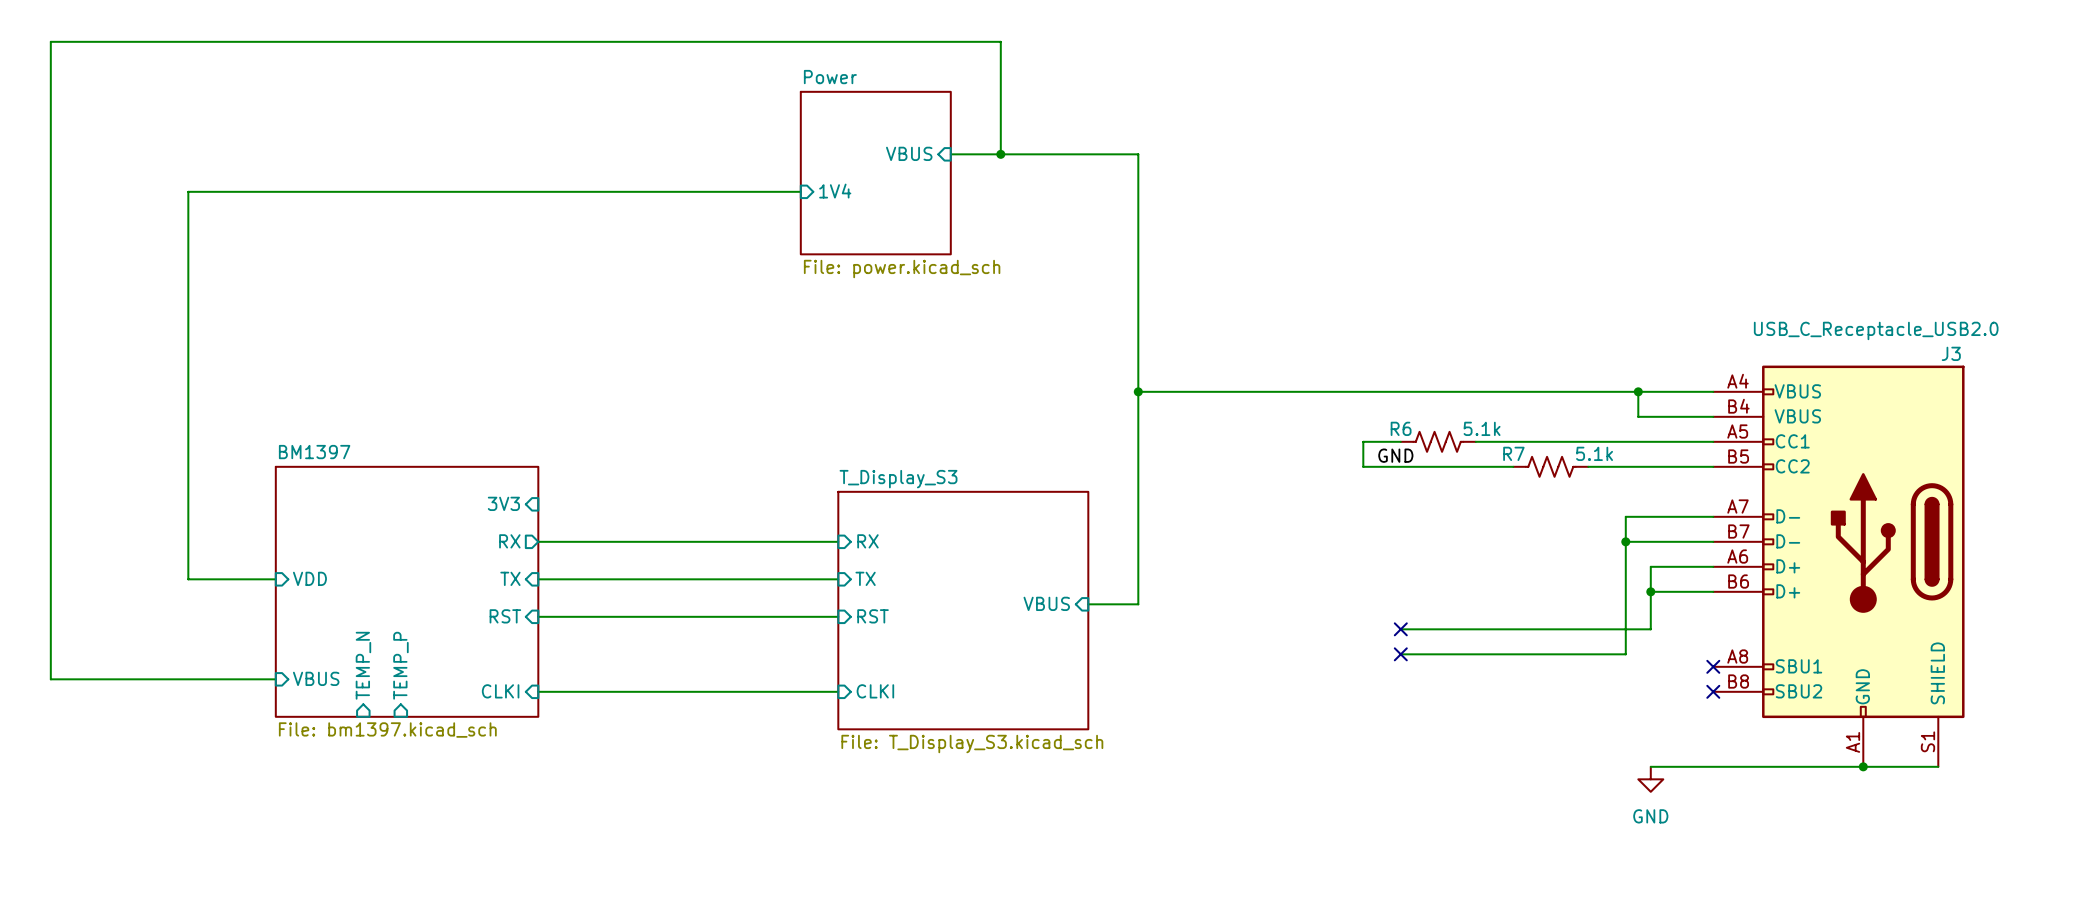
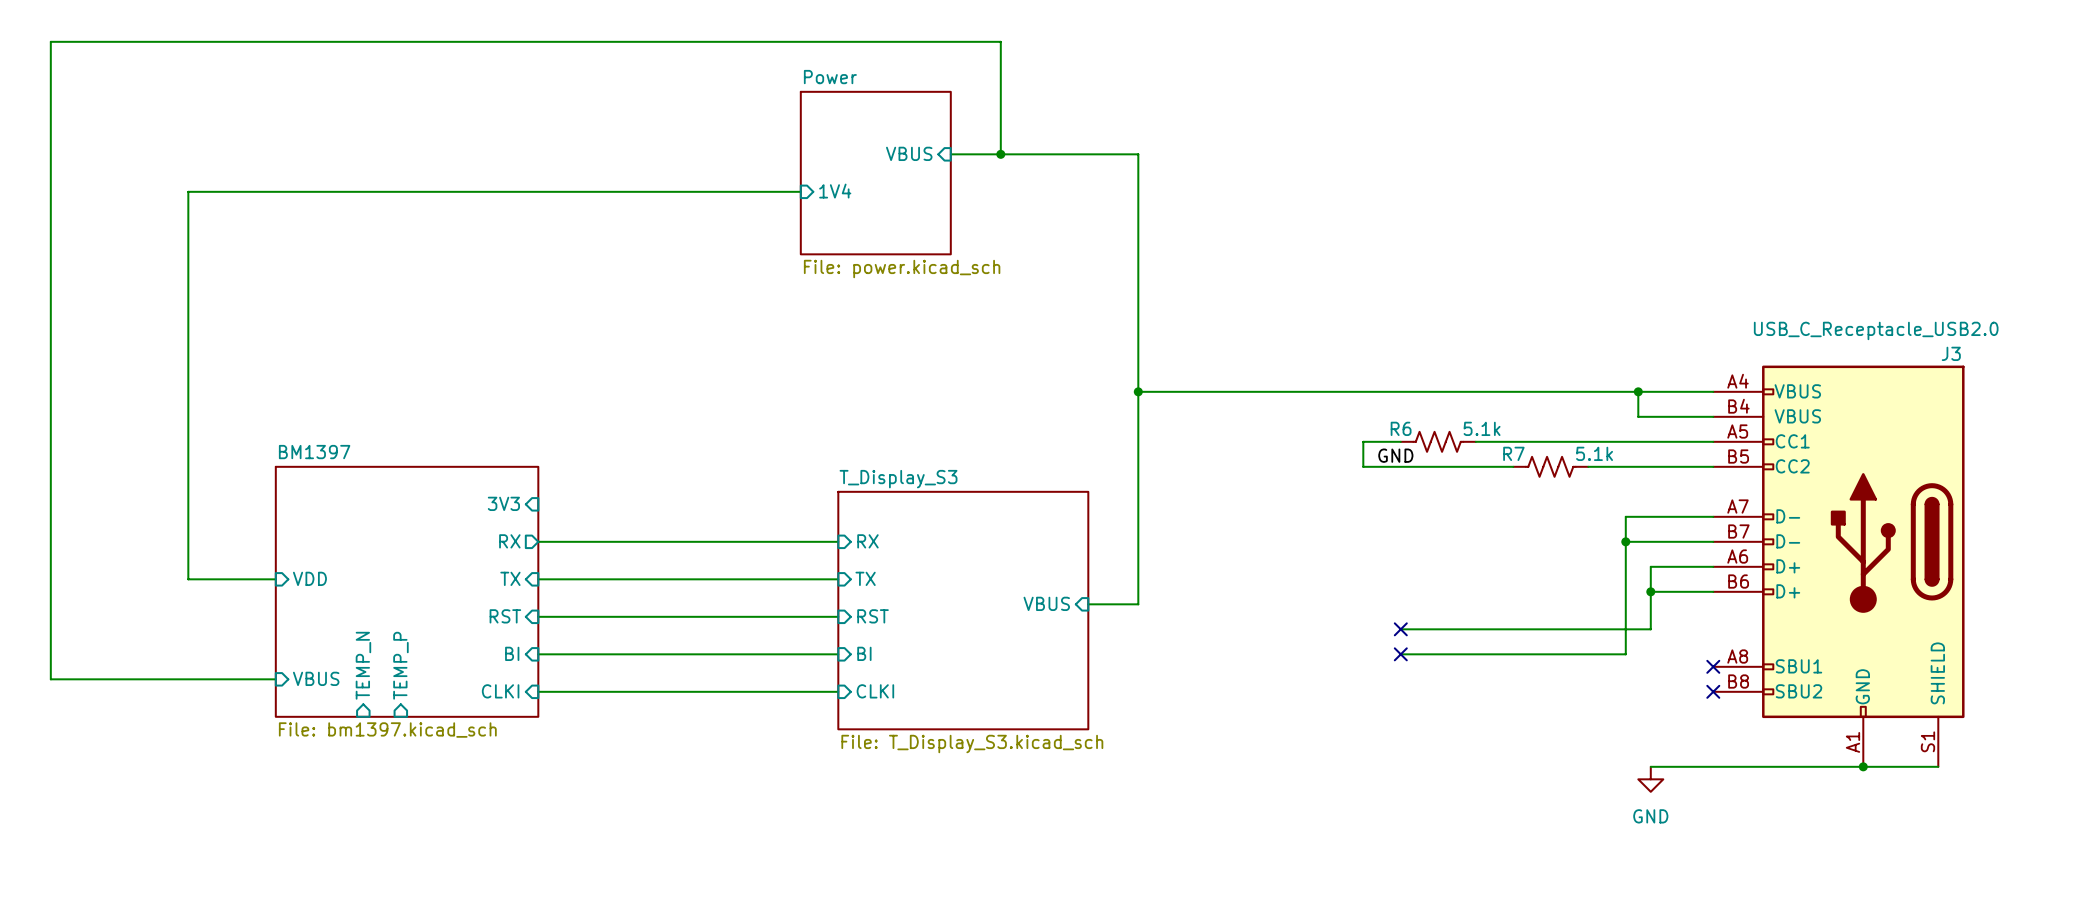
sheet pin: none -> BI (512, 653)
sheet pin: none -> BI (864, 653)
wire: none -> (538, 654) (838, 654)

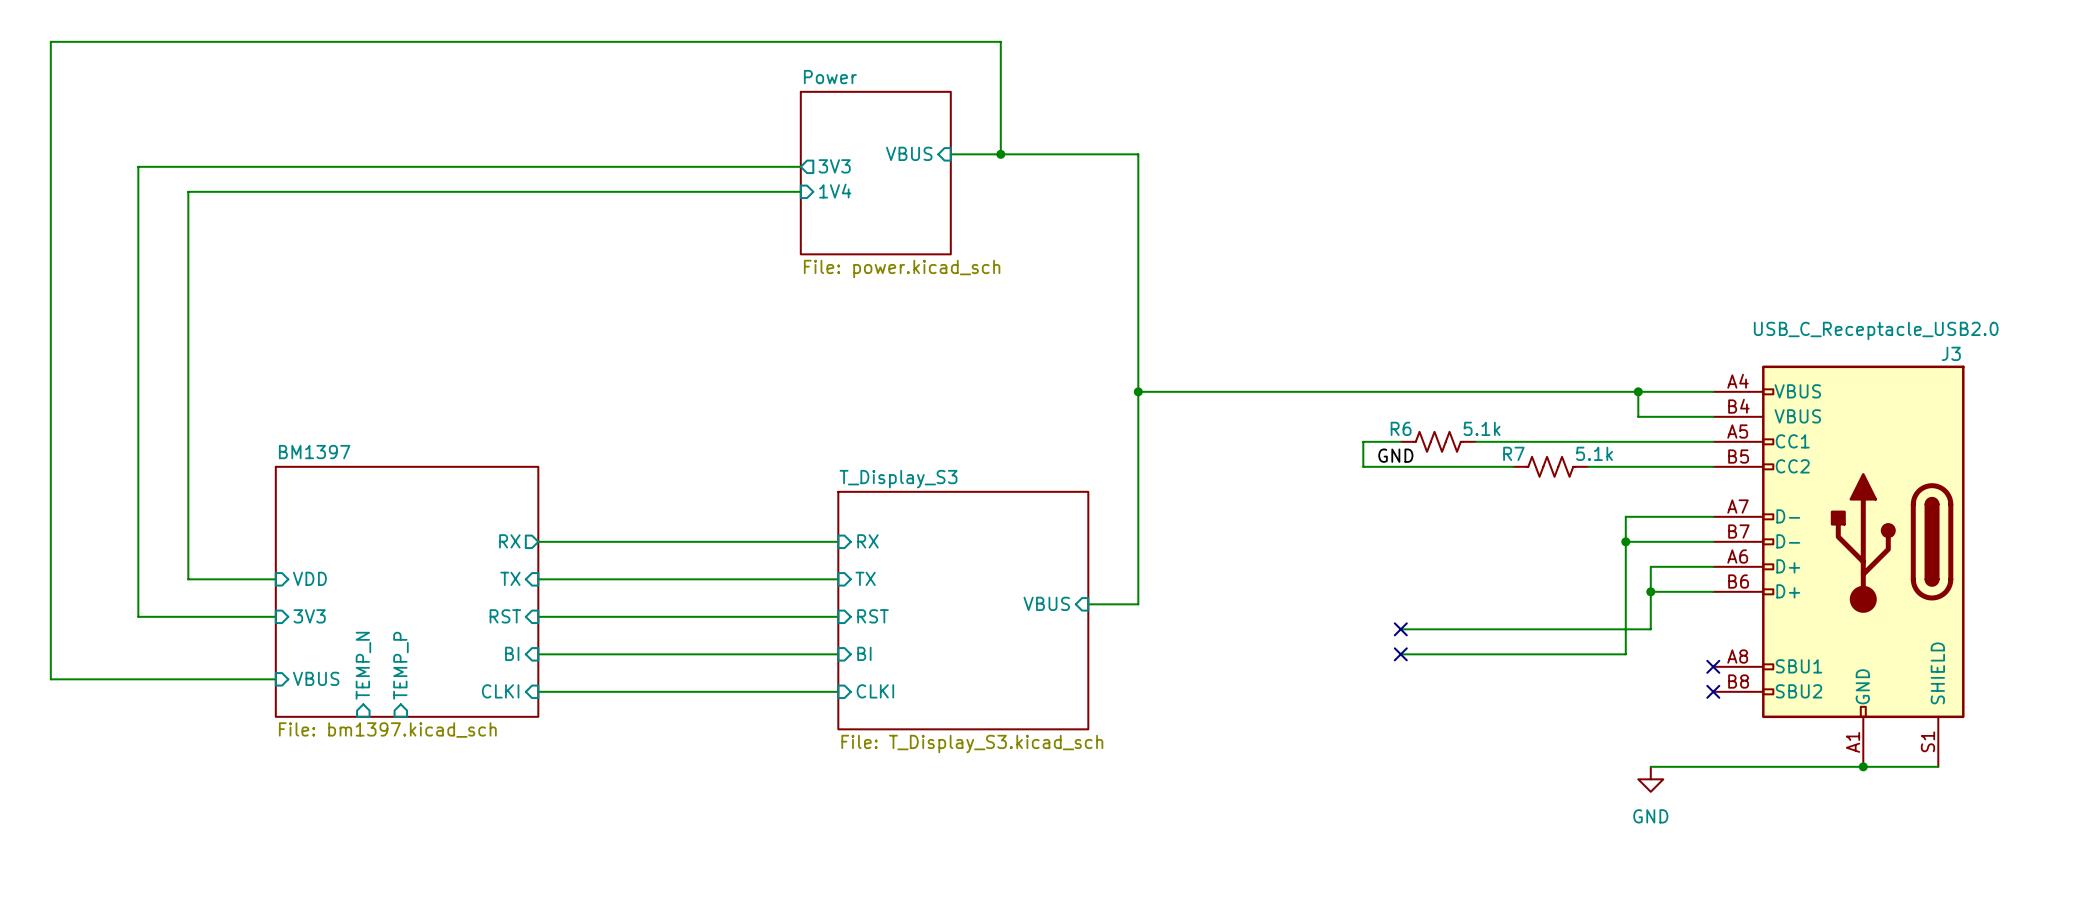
wire: none -> (800, 166) (138, 166) (138, 616) (275, 616)
sheet pin: none -> 3V3 (834, 166)
sheet pin: 3V3 (503, 503) -> none
sheet pin: none -> 3V3 (309, 616)

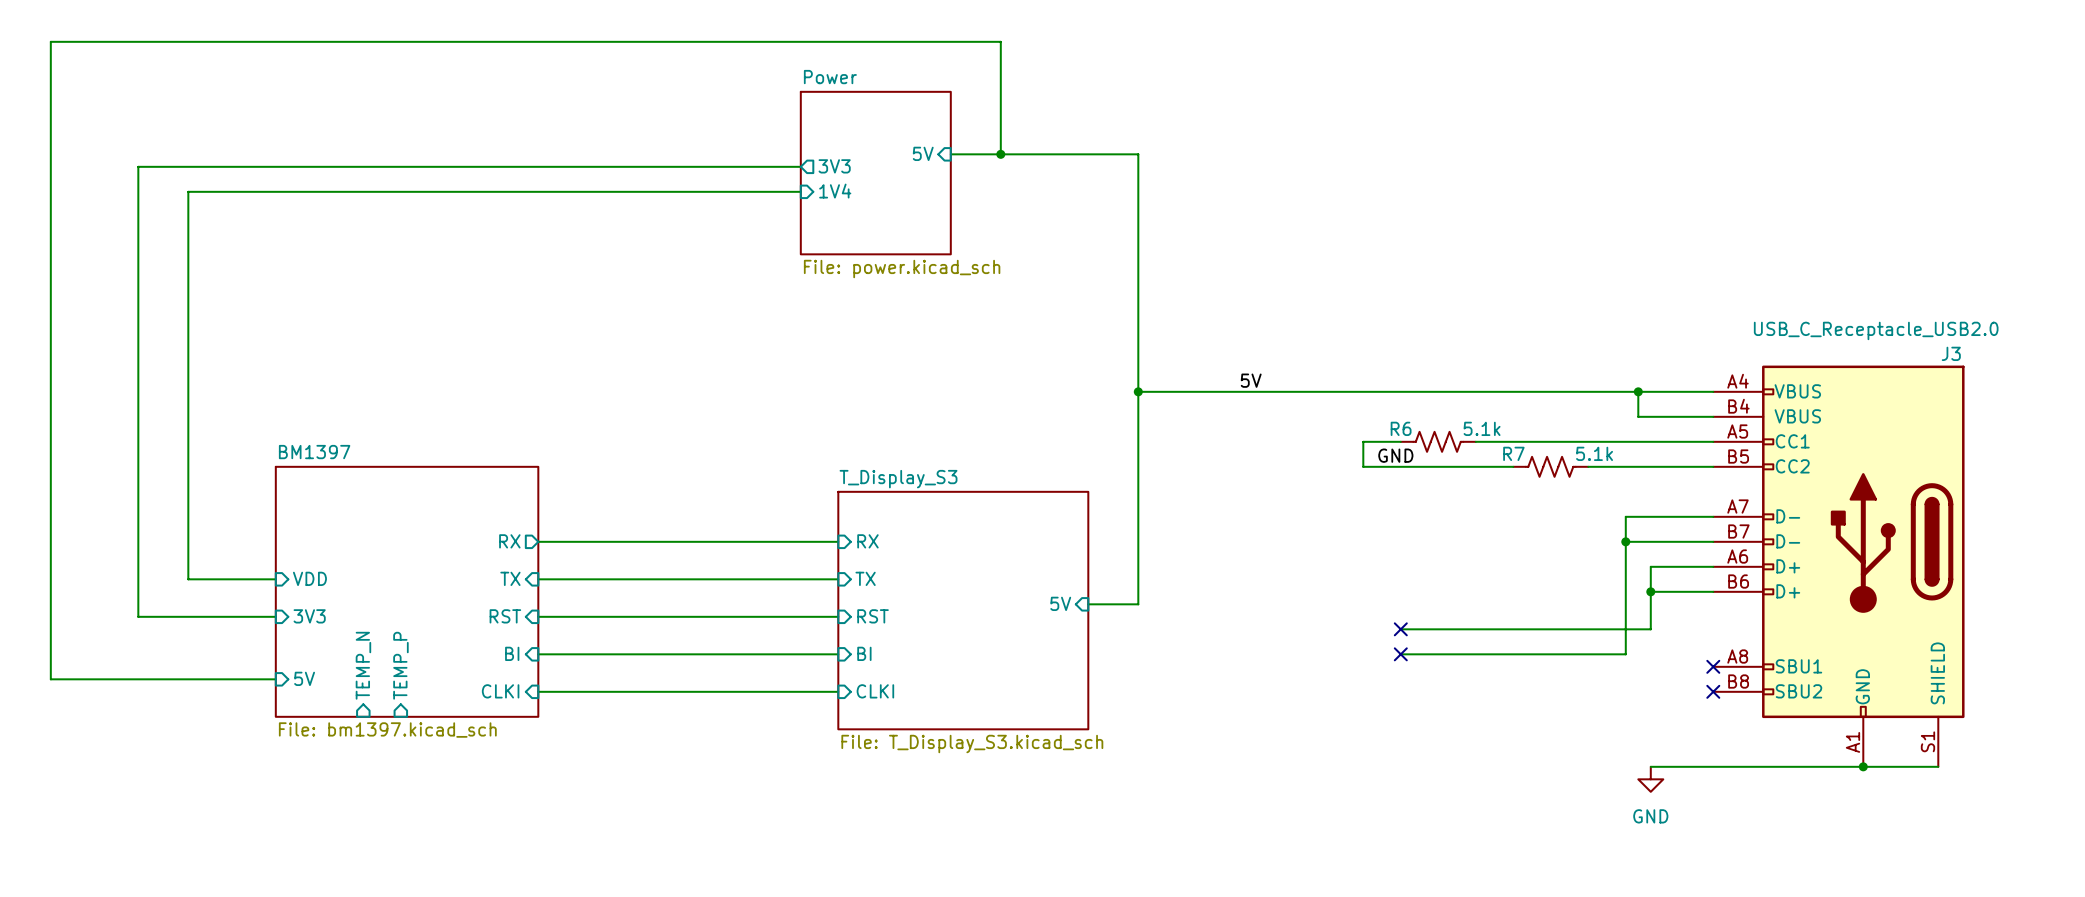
sheet pin: VBUS (909, 153) -> 5V (923, 153)
label: none -> 5V (1251, 380)
sheet pin: VBUS (1046, 603) -> 5V (1060, 603)
sheet pin: VBUS (316, 678) -> 5V (304, 678)

